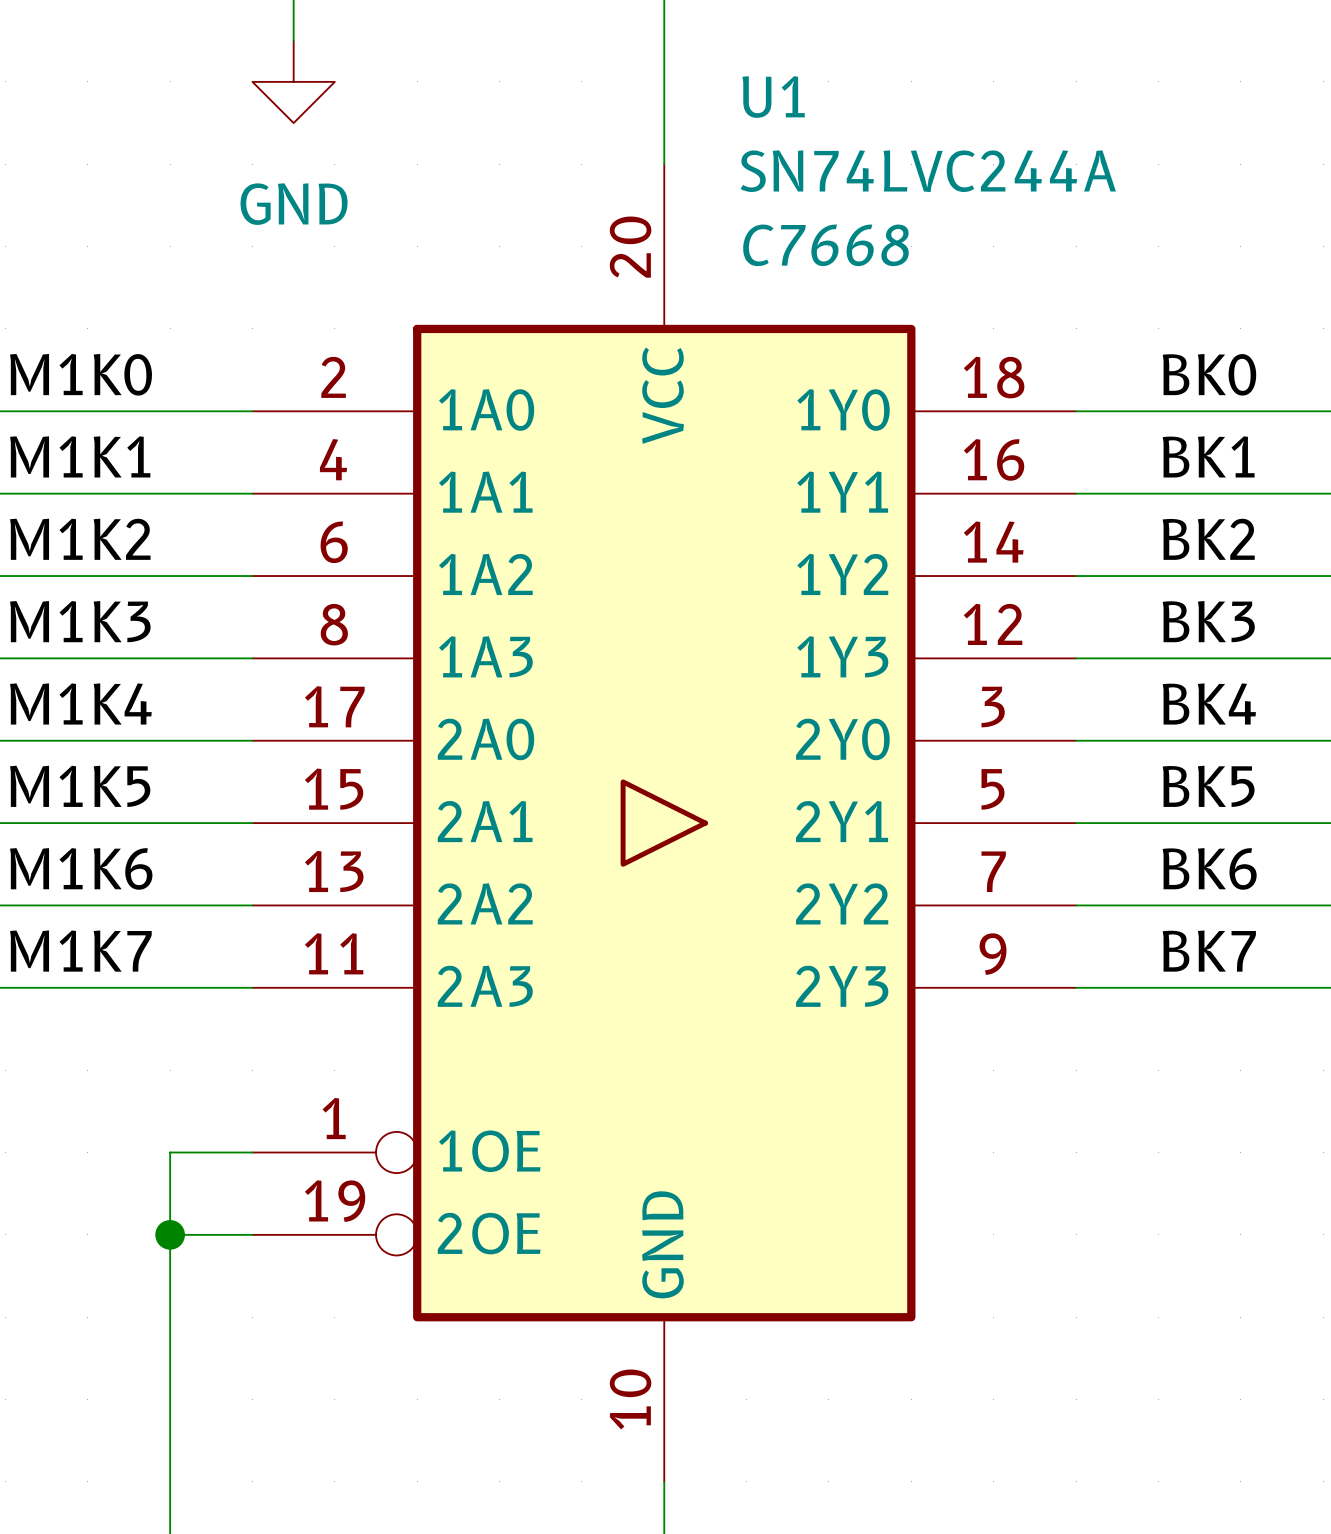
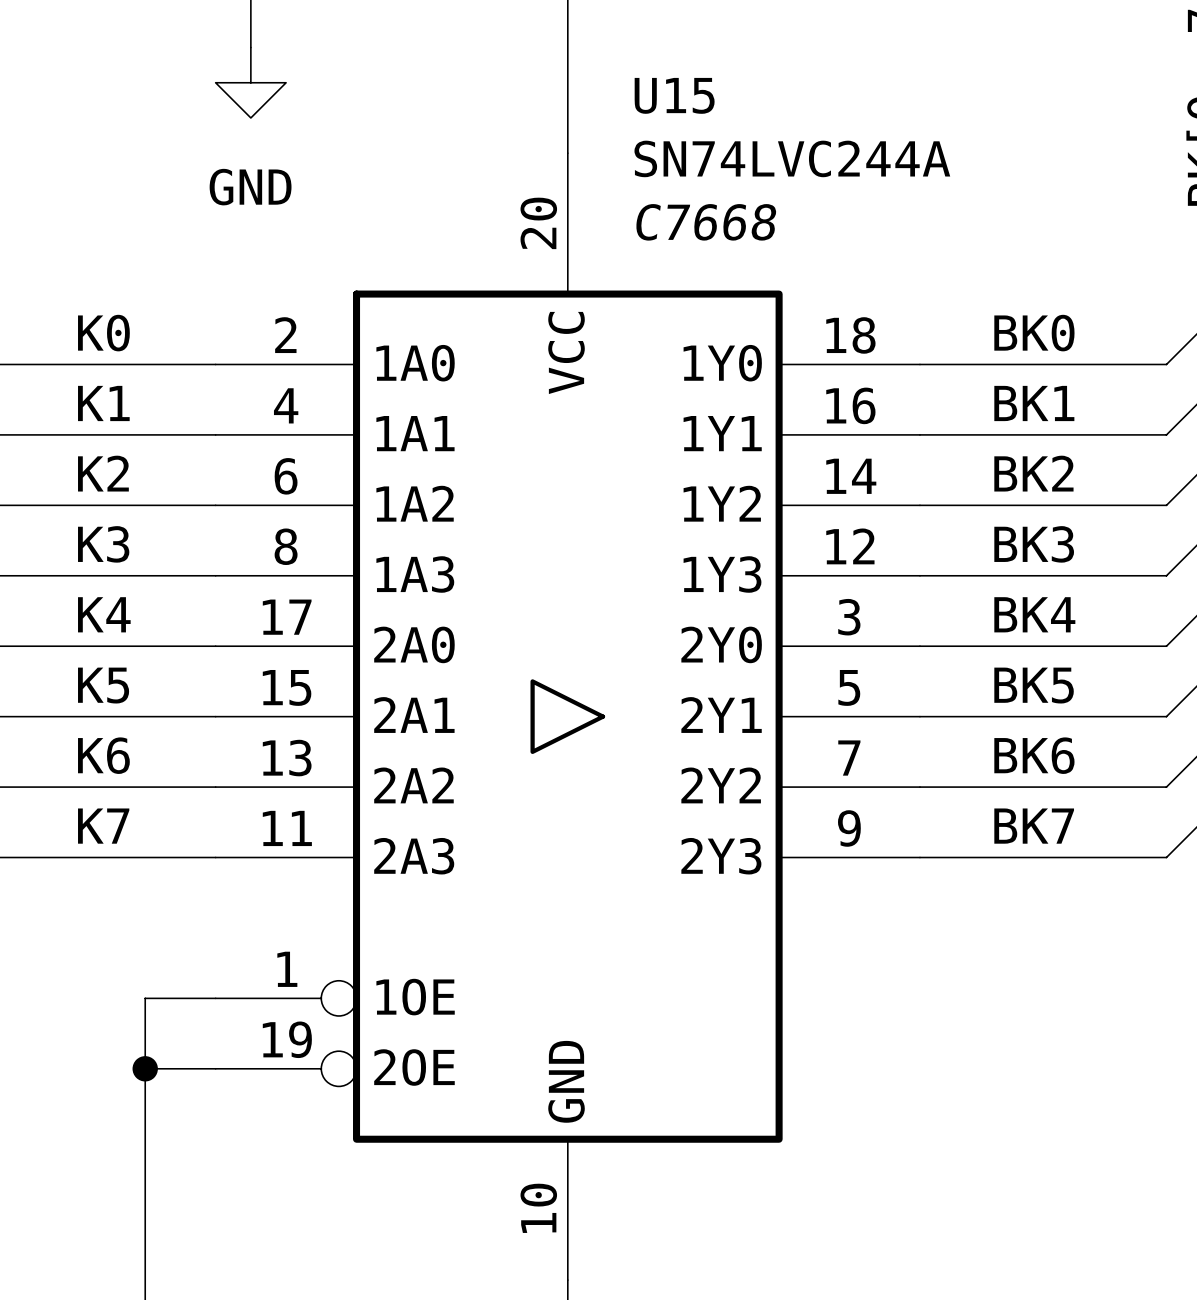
U1 name: U1 (773, 97) -> U15 (674, 95)
label: M1K0 (81, 374) -> K0 (103, 333)
label: M1K1 (80, 456) -> K1 (103, 403)
label: M1K2 (80, 539) -> K2 (103, 473)
label: M1K3 (80, 621) -> K3 (103, 544)
label: M1K4 (80, 703) -> K4 (104, 614)
label: M1K5 (80, 786) -> K5 (103, 685)
label: M1K6 (81, 868) -> K6 (103, 755)
label: M1K7 (80, 951) -> K7 (103, 826)

